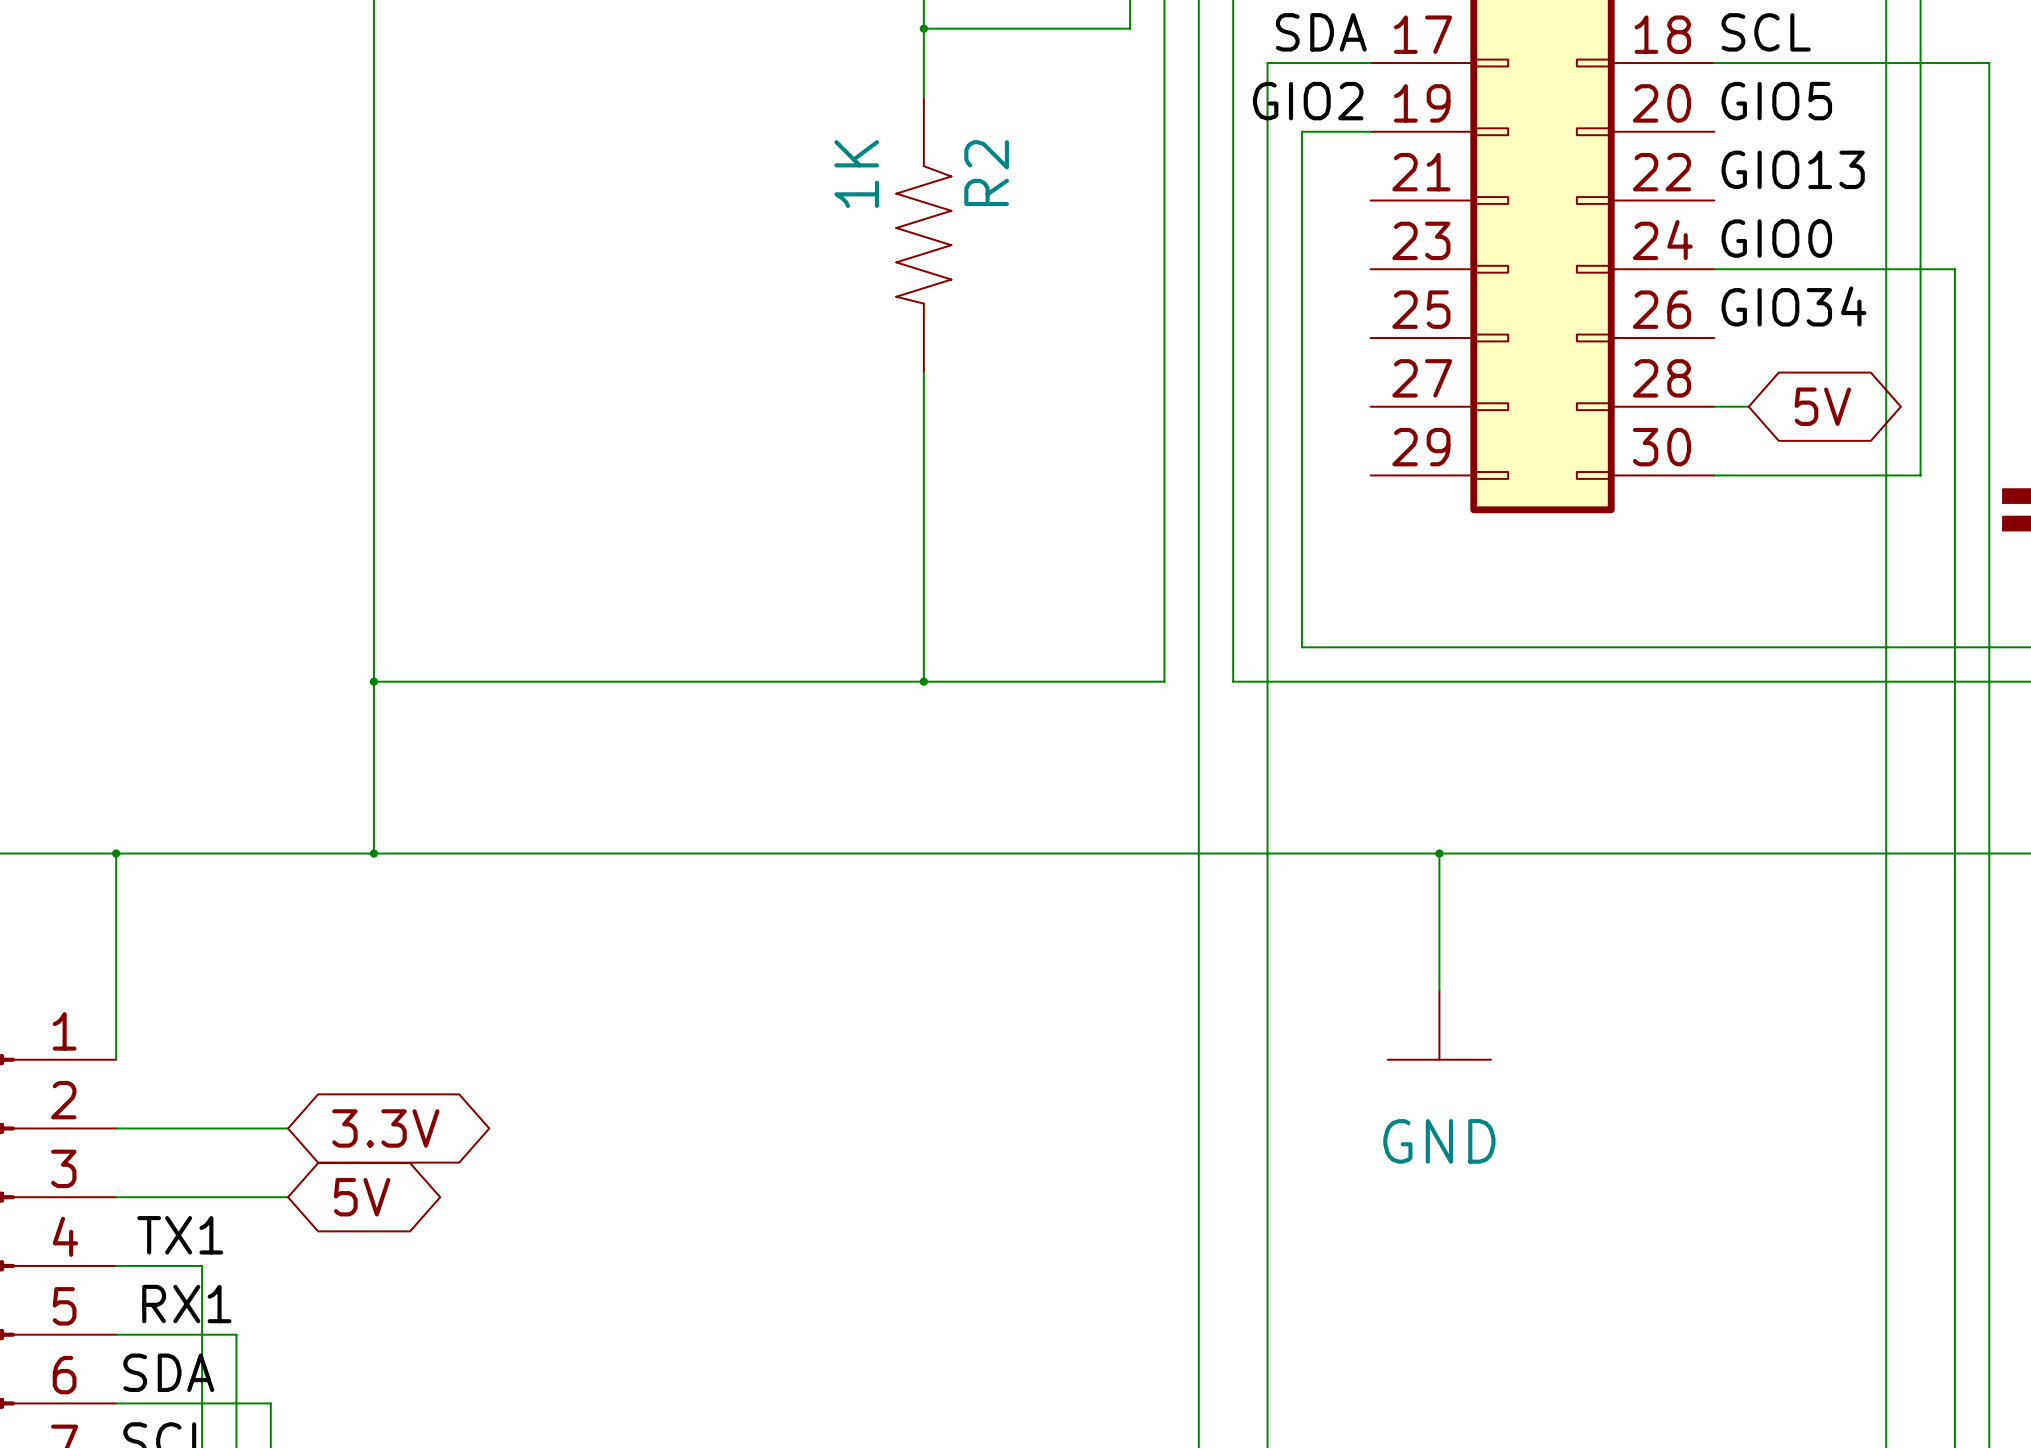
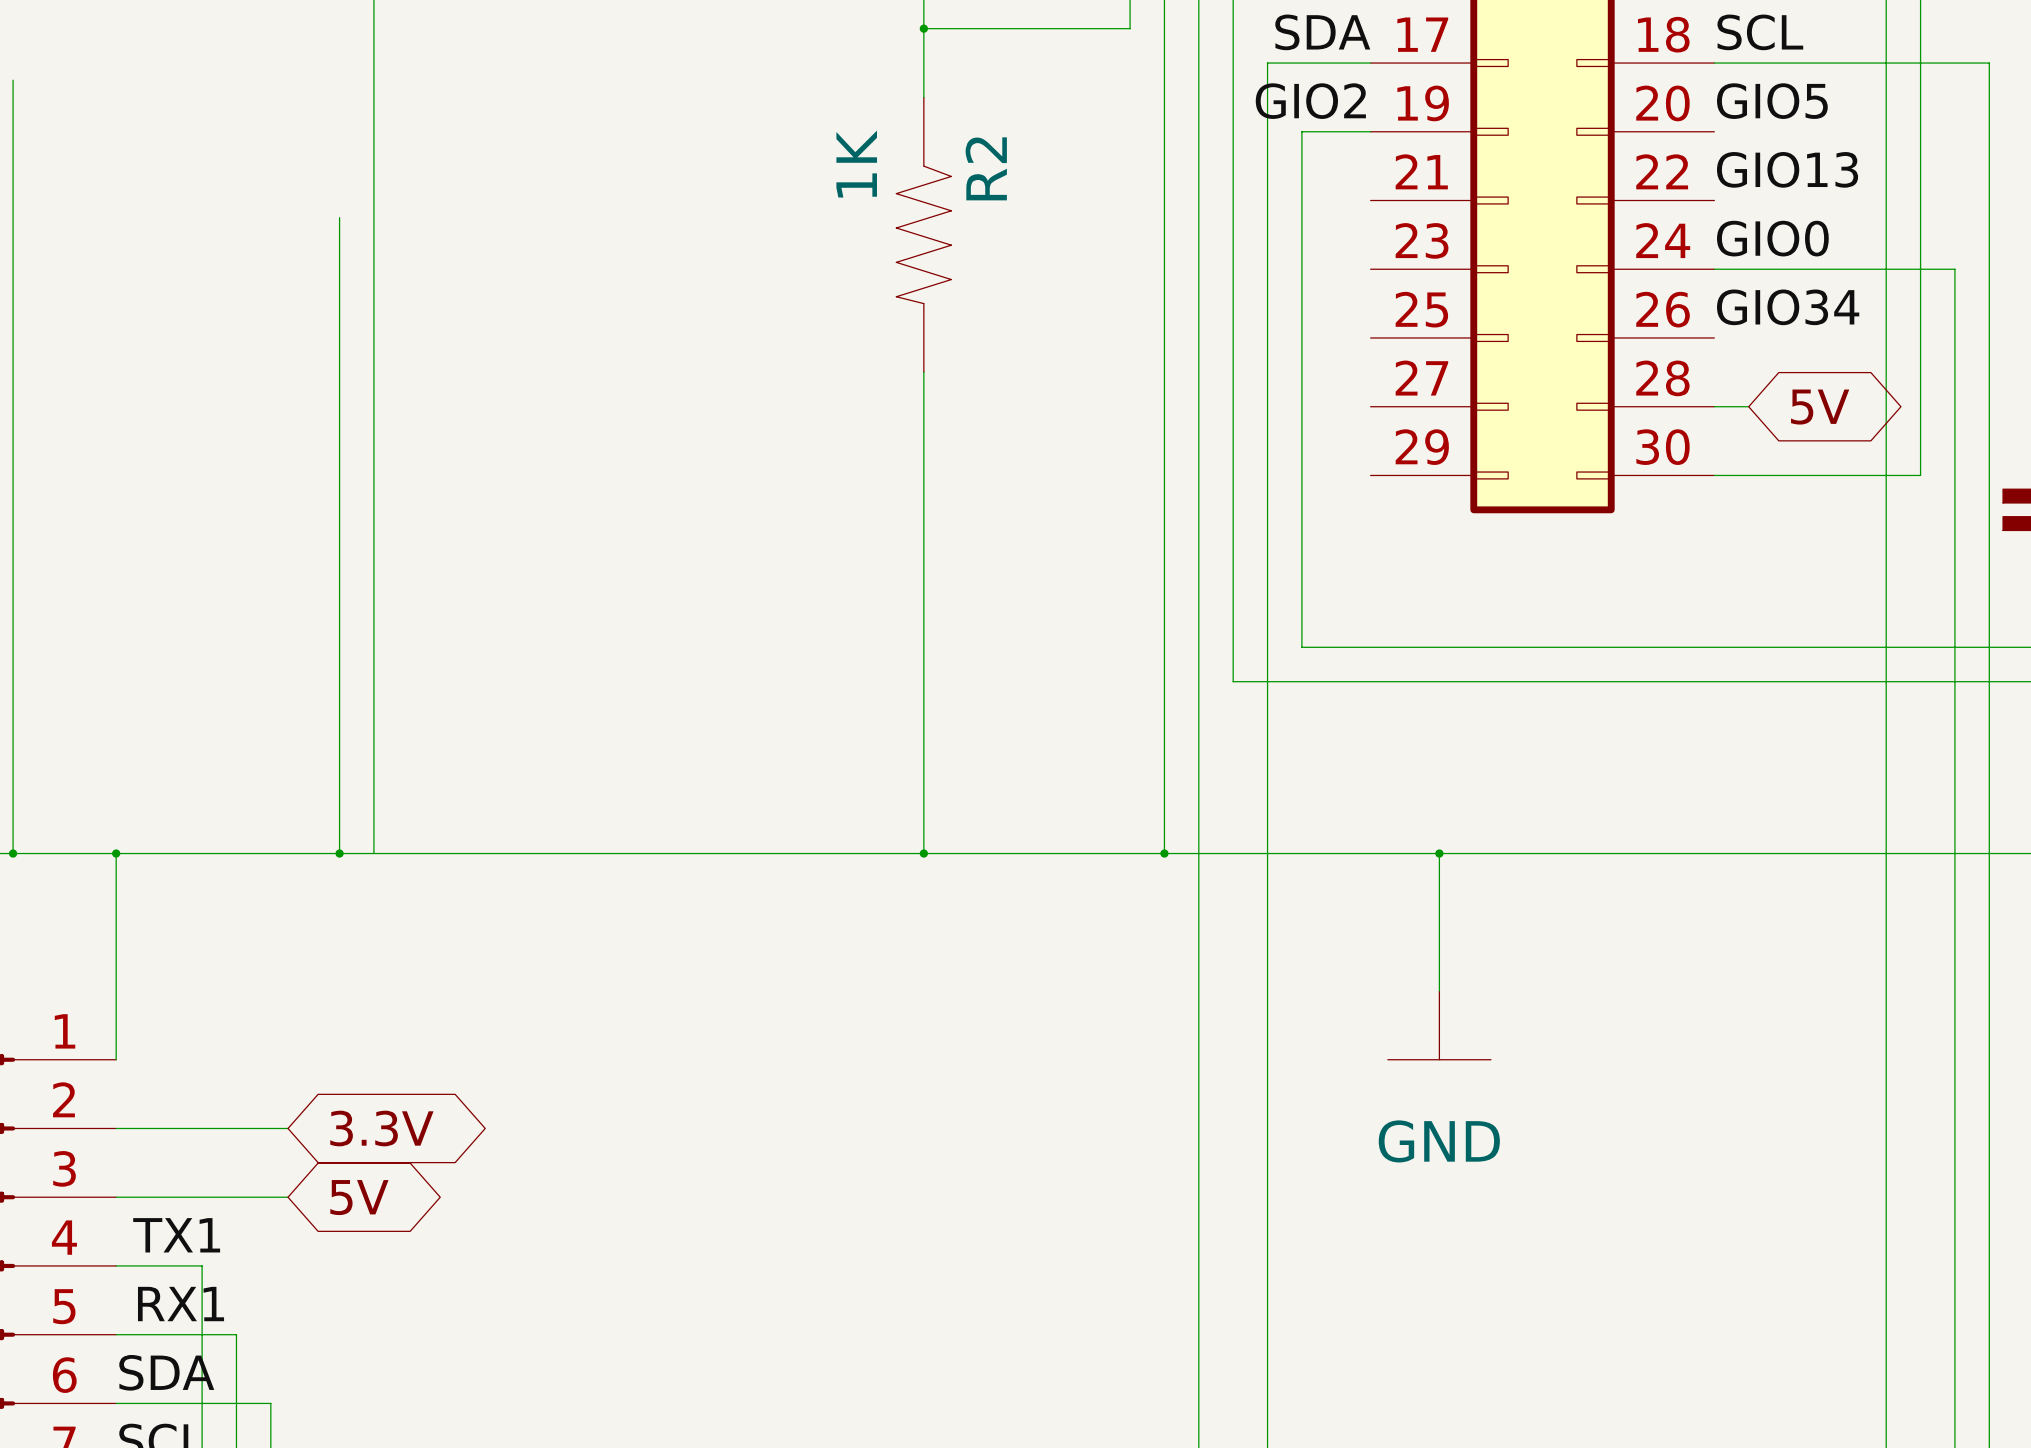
wire: none -> (13, 80) (13, 853)
wire: none -> (339, 217) (339, 853)
wire: (373, 681) (1164, 681) -> (1164, 853) (1164, 681)
junction: (373, 681) -> none
wire: none -> (923, 681) (923, 853)
junction: (923, 681) -> none
junction: none -> (13, 853)
junction position: (373, 853) -> (339, 853)
junction: none -> (923, 853)
junction: none -> (1164, 853)

